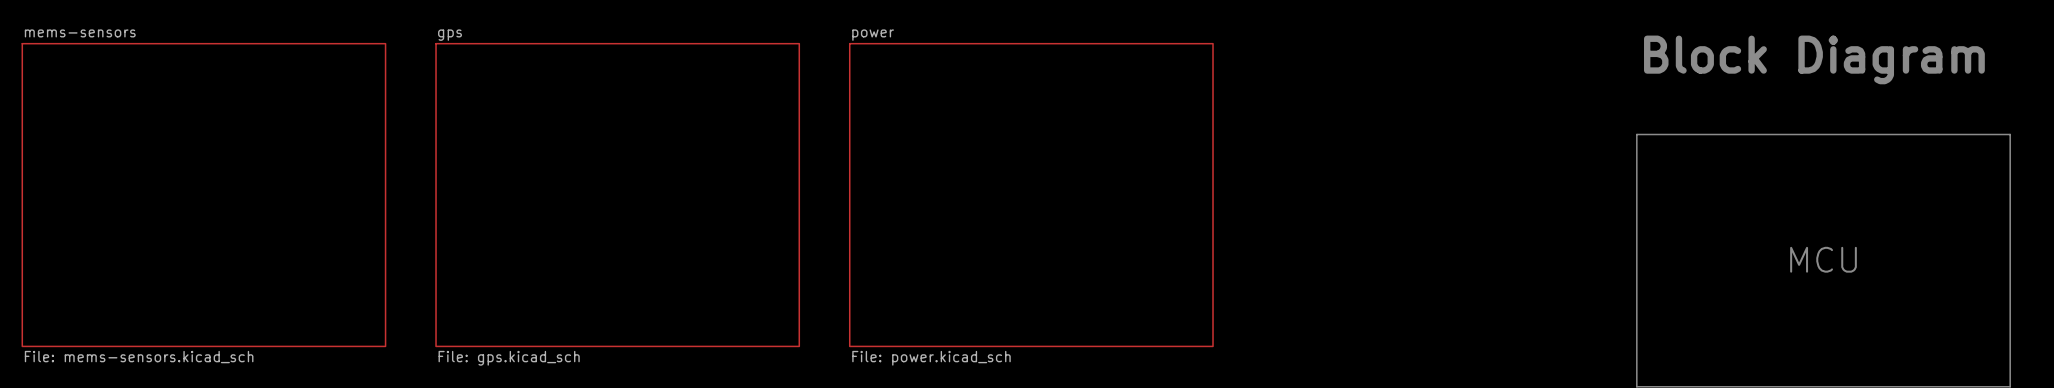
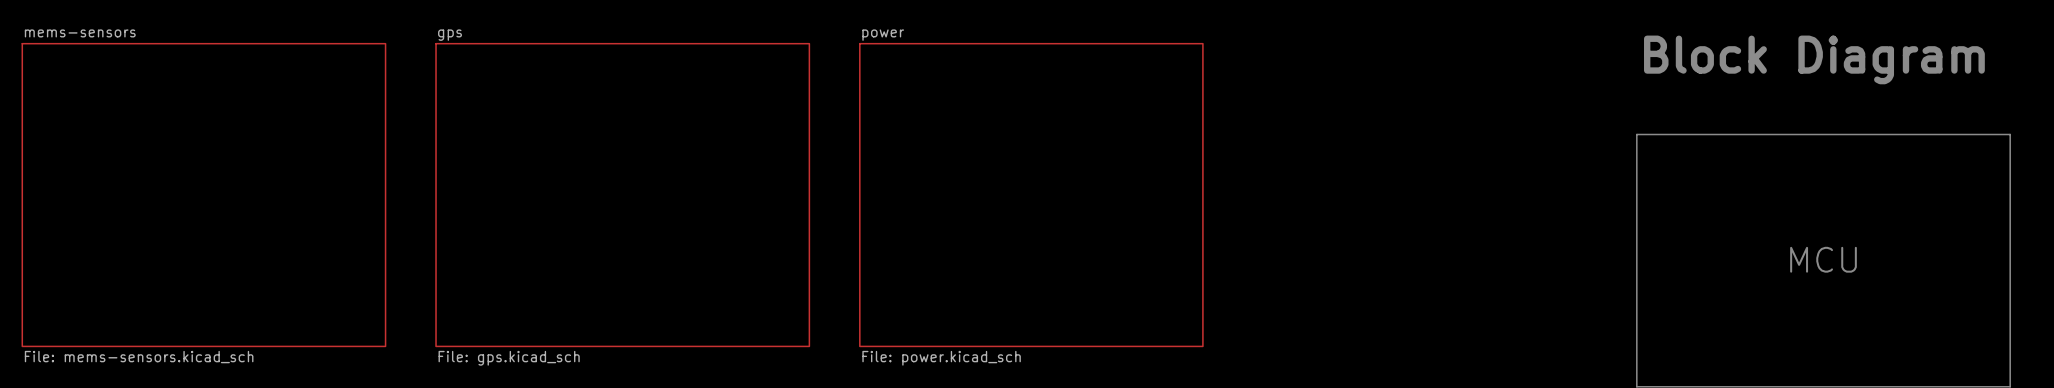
sheet gps shape: [435, 43, 800, 348] -> [435, 43, 810, 348]
sheet power shape: [849, 43, 1214, 348] -> [859, 43, 1204, 348]

